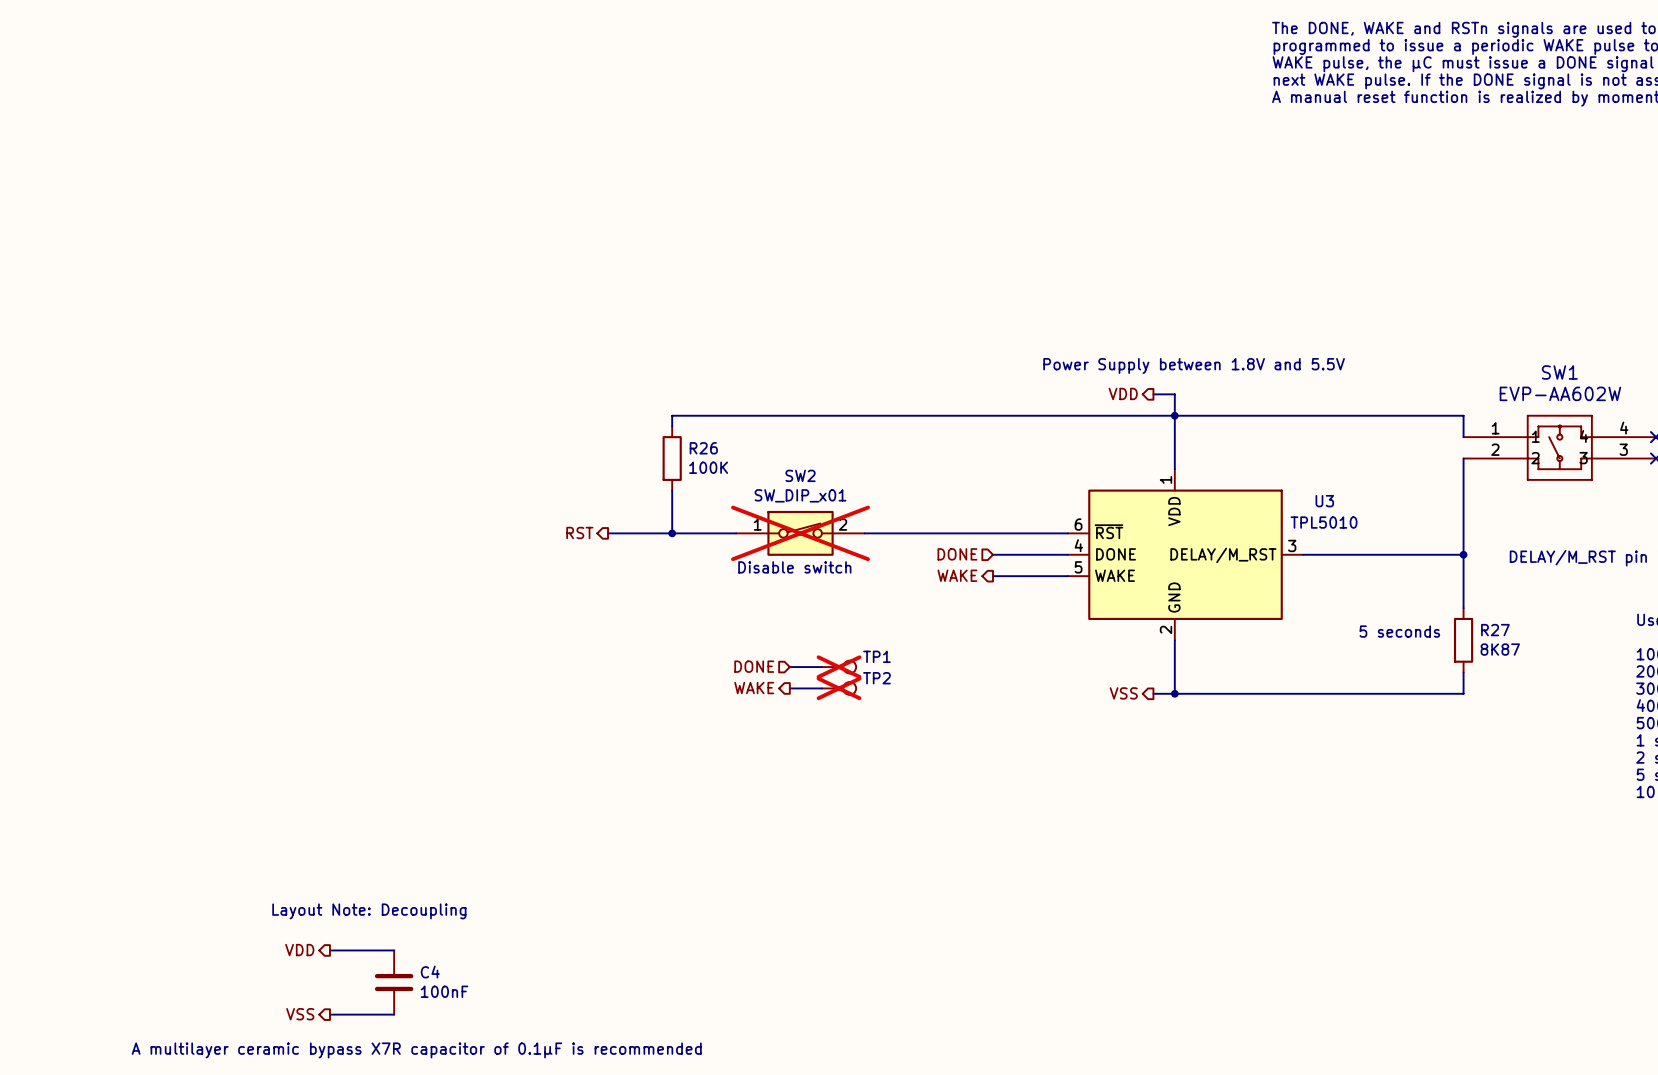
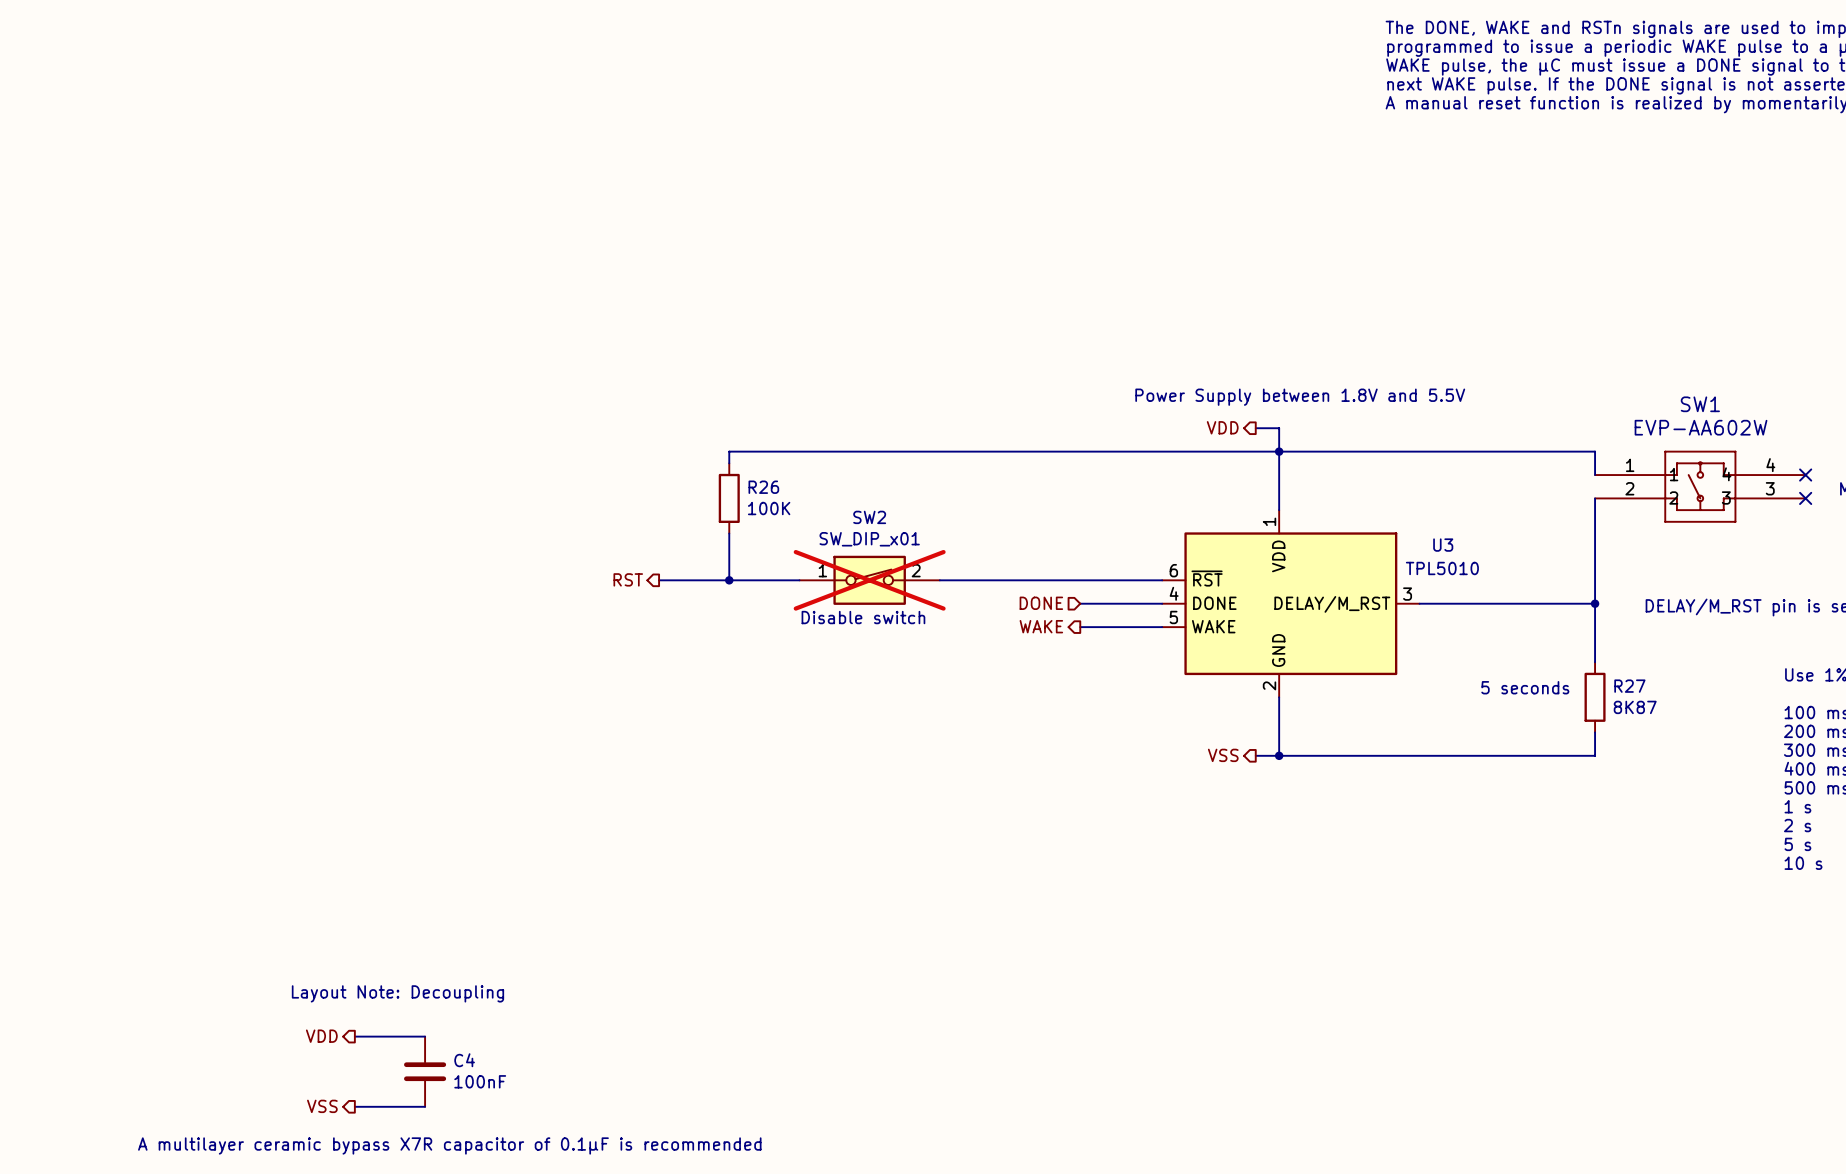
hierarchical label: DONE (754, 666) -> none
wire: (789, 667) (821, 667) -> none
TP1: (839, 667) -> none
hierarchical label: WAKE (754, 688) -> none
wire: (789, 688) (821, 688) -> none
TP2: (839, 688) -> none

